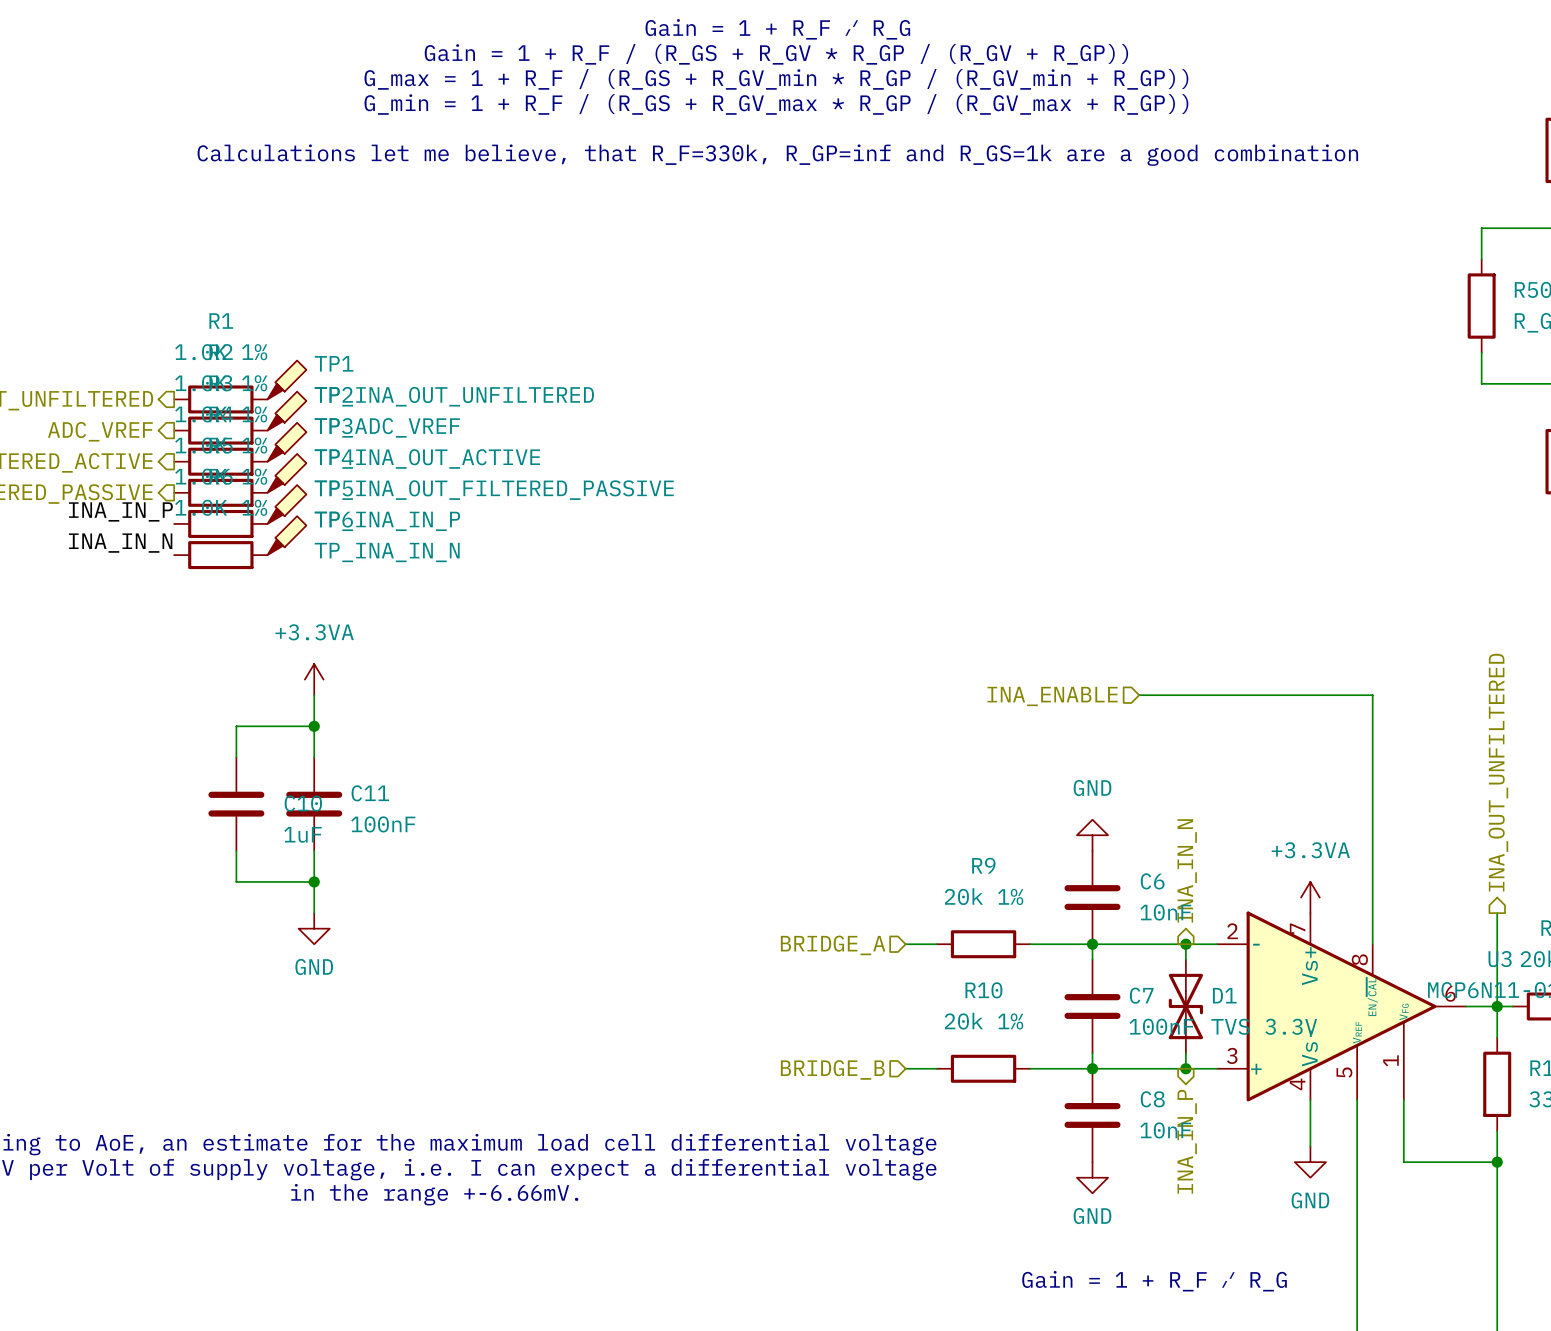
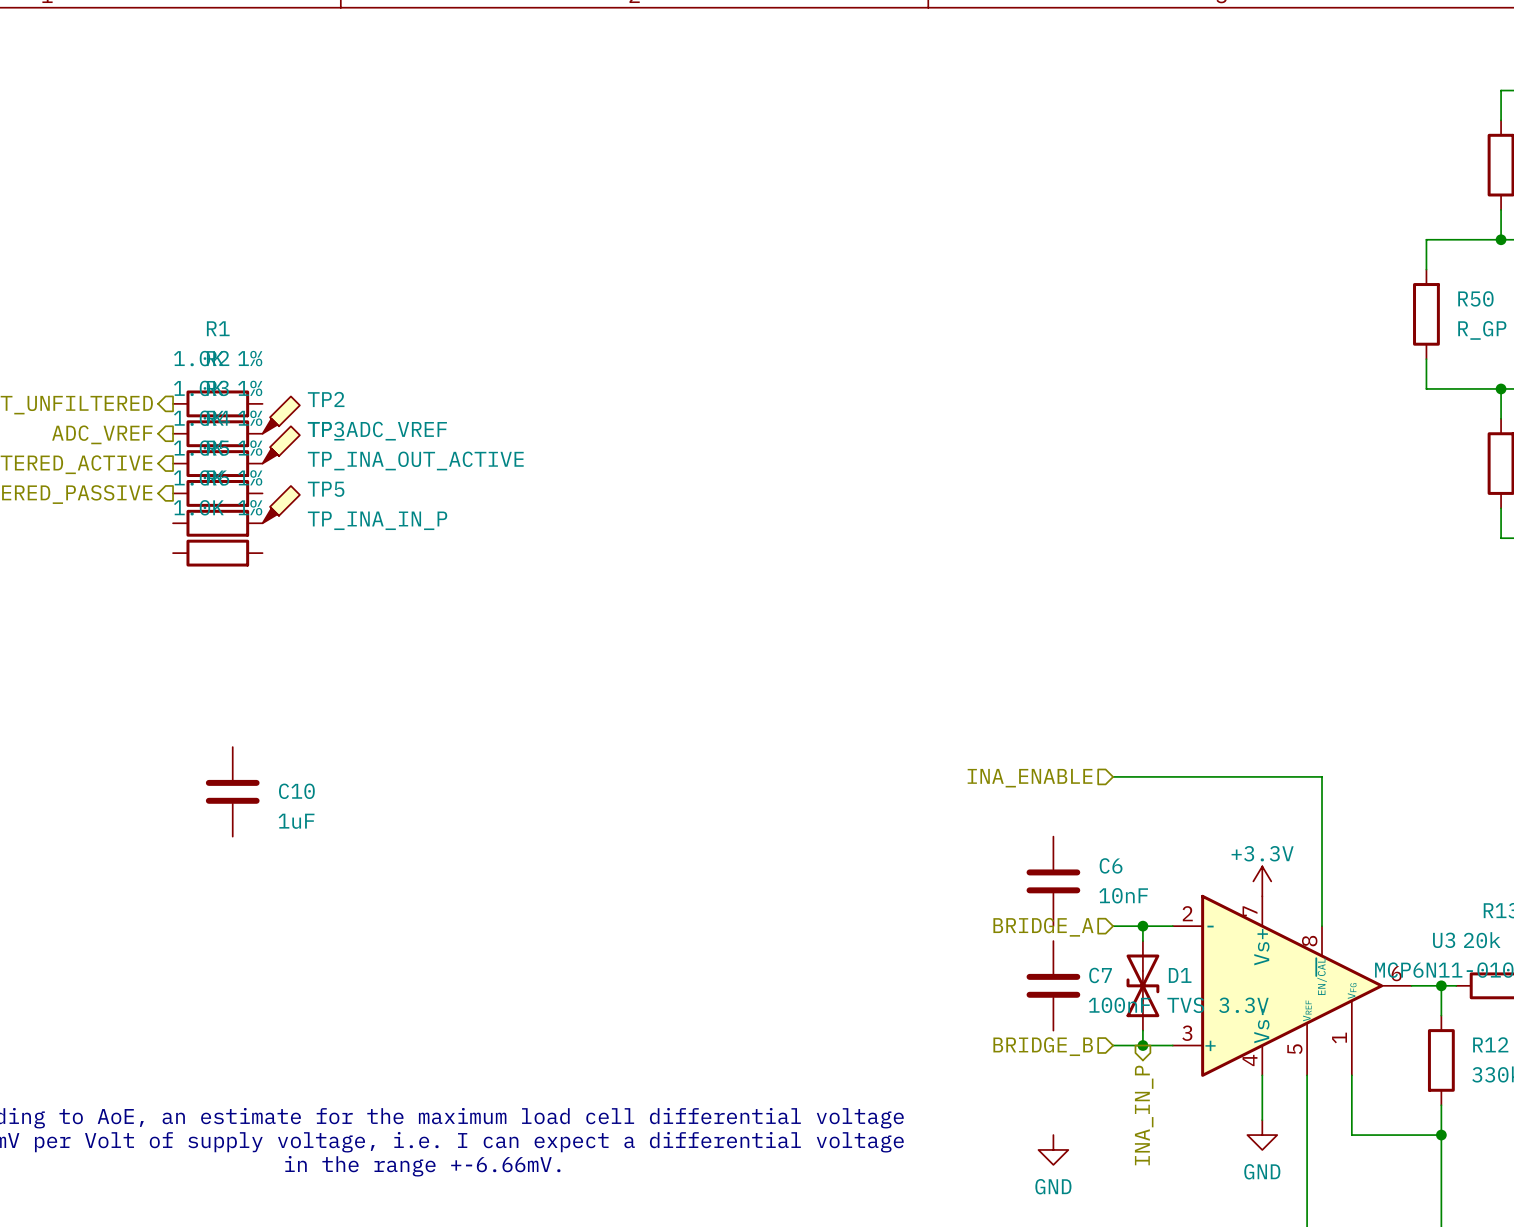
text: Gain = 1 + R_F ⁄ R_G (777, 29) -> none
text: Gain = 1 + R_F / (R_GS + R_GV * R_GP / (R_GV + R_GP)) (776, 54) -> none
text: G_max = 1 + R_F / (R_GS + R_GV_min * R_GP / (R_GV_min + R_GP)) (776, 79) -> none
text: G_min = 1 + R_F / (R_GS + R_GV_max * R_GP / (R_GV_max + R_GP)) (776, 104) -> none
text: Calculations let me believe, that R_F=330k, R_GP=inf and R_GS=1k are a good combination (777, 155) -> none
TP1: TP_INA_OUT_UNFILTERED (286, 379) -> none
part: TP_INA_OUT_FILTERED_PASSIVE (286, 473) -> none
label: INA_IN_P (120, 511) -> none
part: TP_INA_IN_N (286, 535) -> none
label: INA_IN_N (120, 543) -> none
power symbol: +3.3VA (314, 679) -> none
wire: (314, 695) (314, 757) -> none
wire: (1139, 695) (1372, 695) (1372, 788) -> (1113, 776) (1322, 776)
hierarchical label position: INA_ENABLE (1052, 696) -> INA_ENABLE (1030, 778)
wire: (314, 726) (236, 726) (236, 757) -> none
junction: (314, 726) -> none
hierarchical label: INA_OUT_UNFILTERED (1498, 772) -> none
C11: 100nF (314, 804) -> none
power symbol: GND (1092, 835) -> none
wire: (236, 850) (236, 881) (314, 881) -> none
wire: (314, 850) (314, 913) -> none
hierarchical label: INA_IN_N (1187, 870) -> none
junction: (314, 881) -> none
power symbol: +3.3VA (1310, 897) -> +3.3V (1262, 881)
wire: (1497, 913) (1497, 1006) -> none
power symbol: GND (314, 928) -> none
wire: (905, 944) (936, 944) -> none
R9: 20k 1% (983, 944) -> none
wire: (1030, 944) (1154, 944) -> none
wire: (1092, 944) (1092, 959) -> none
junction: (1092, 944) -> none
hierarchical label position: BRIDGE_A (833, 945) -> BRIDGE_A (1043, 927)
wire: (1092, 1053) (1092, 1068) -> none
wire: (905, 1068) (936, 1068) -> none
R10: 20k 1% (983, 1068) -> none
wire: (1030, 1068) (1154, 1068) -> none
junction: (1092, 1068) -> none
hierarchical label position: BRIDGE_B (832, 1069) -> BRIDGE_B (1043, 1046)
C8: 10nF (1092, 1115) -> none

